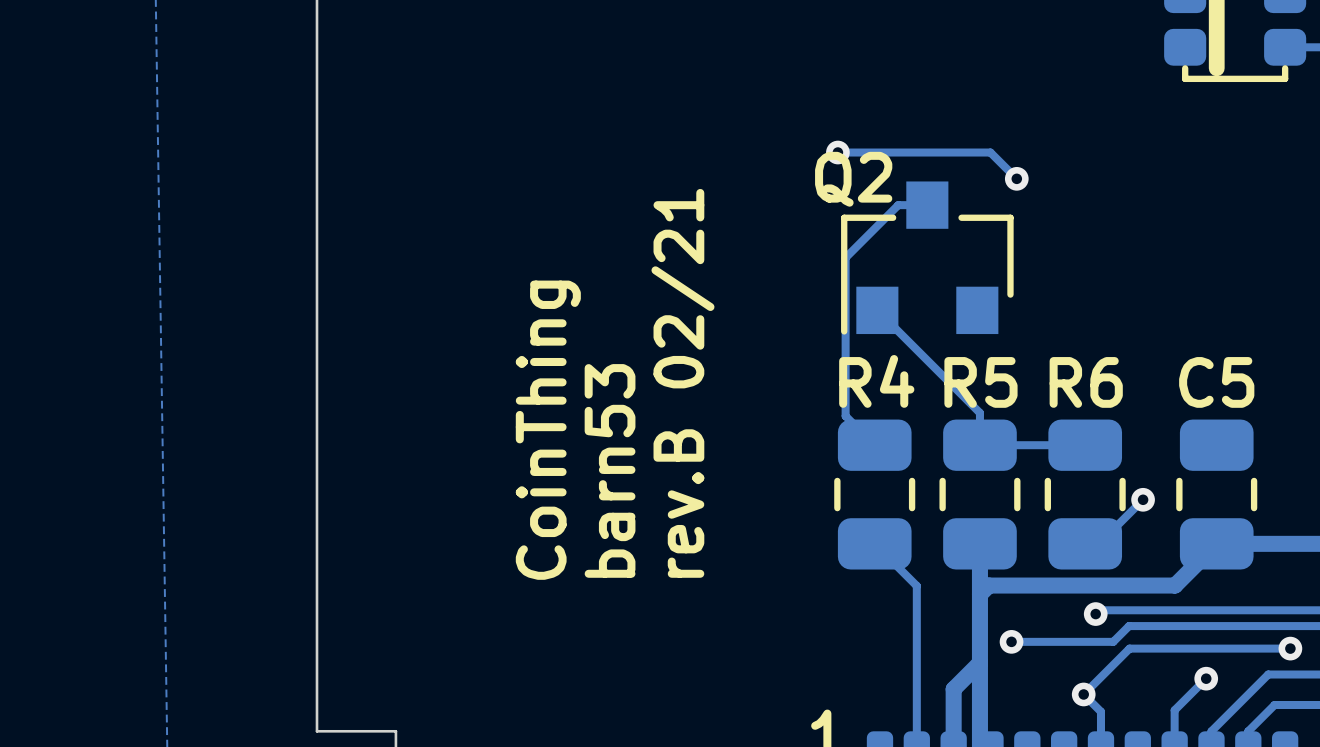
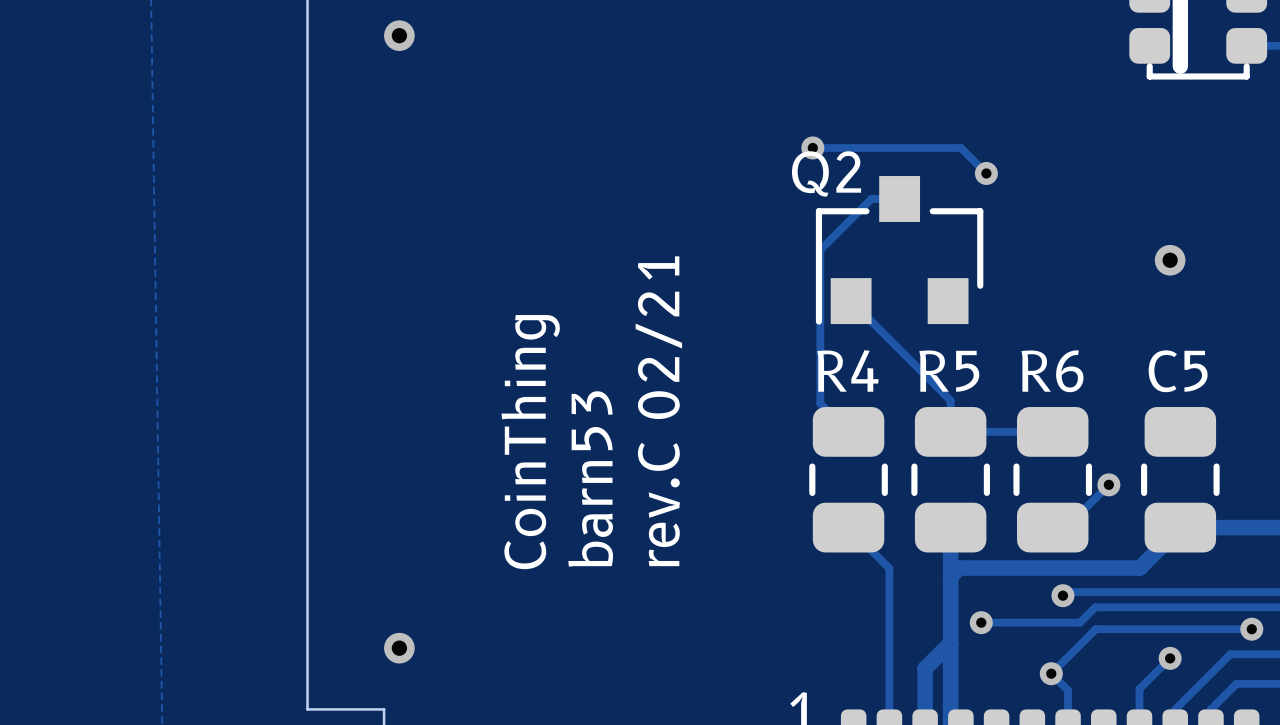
via: none -> (399, 35)
via: none -> (1170, 260)
text: rev.B 02/21 (682, 383) -> rev.C 02/21 (658, 411)
via: none -> (399, 648)

